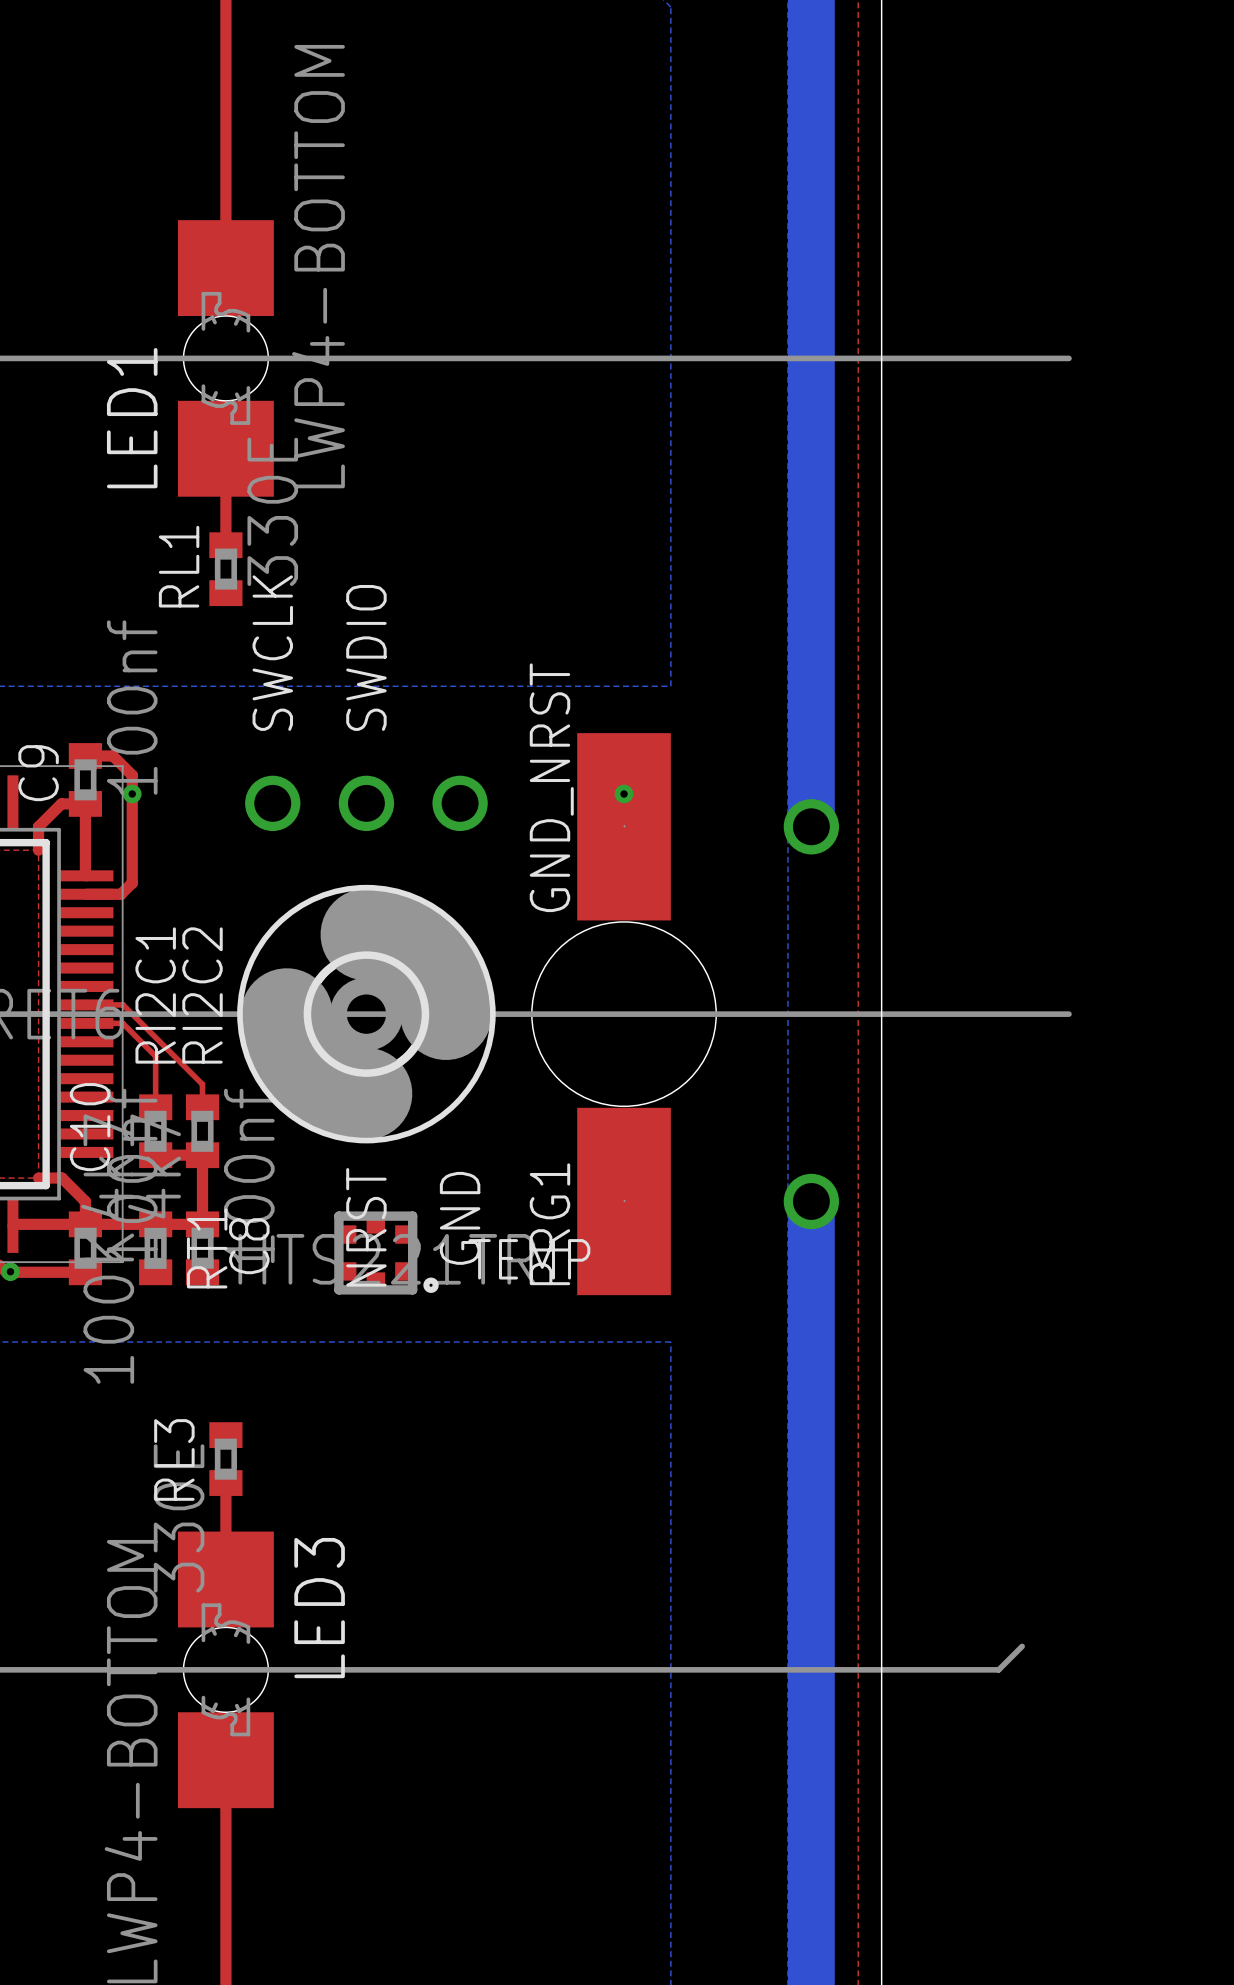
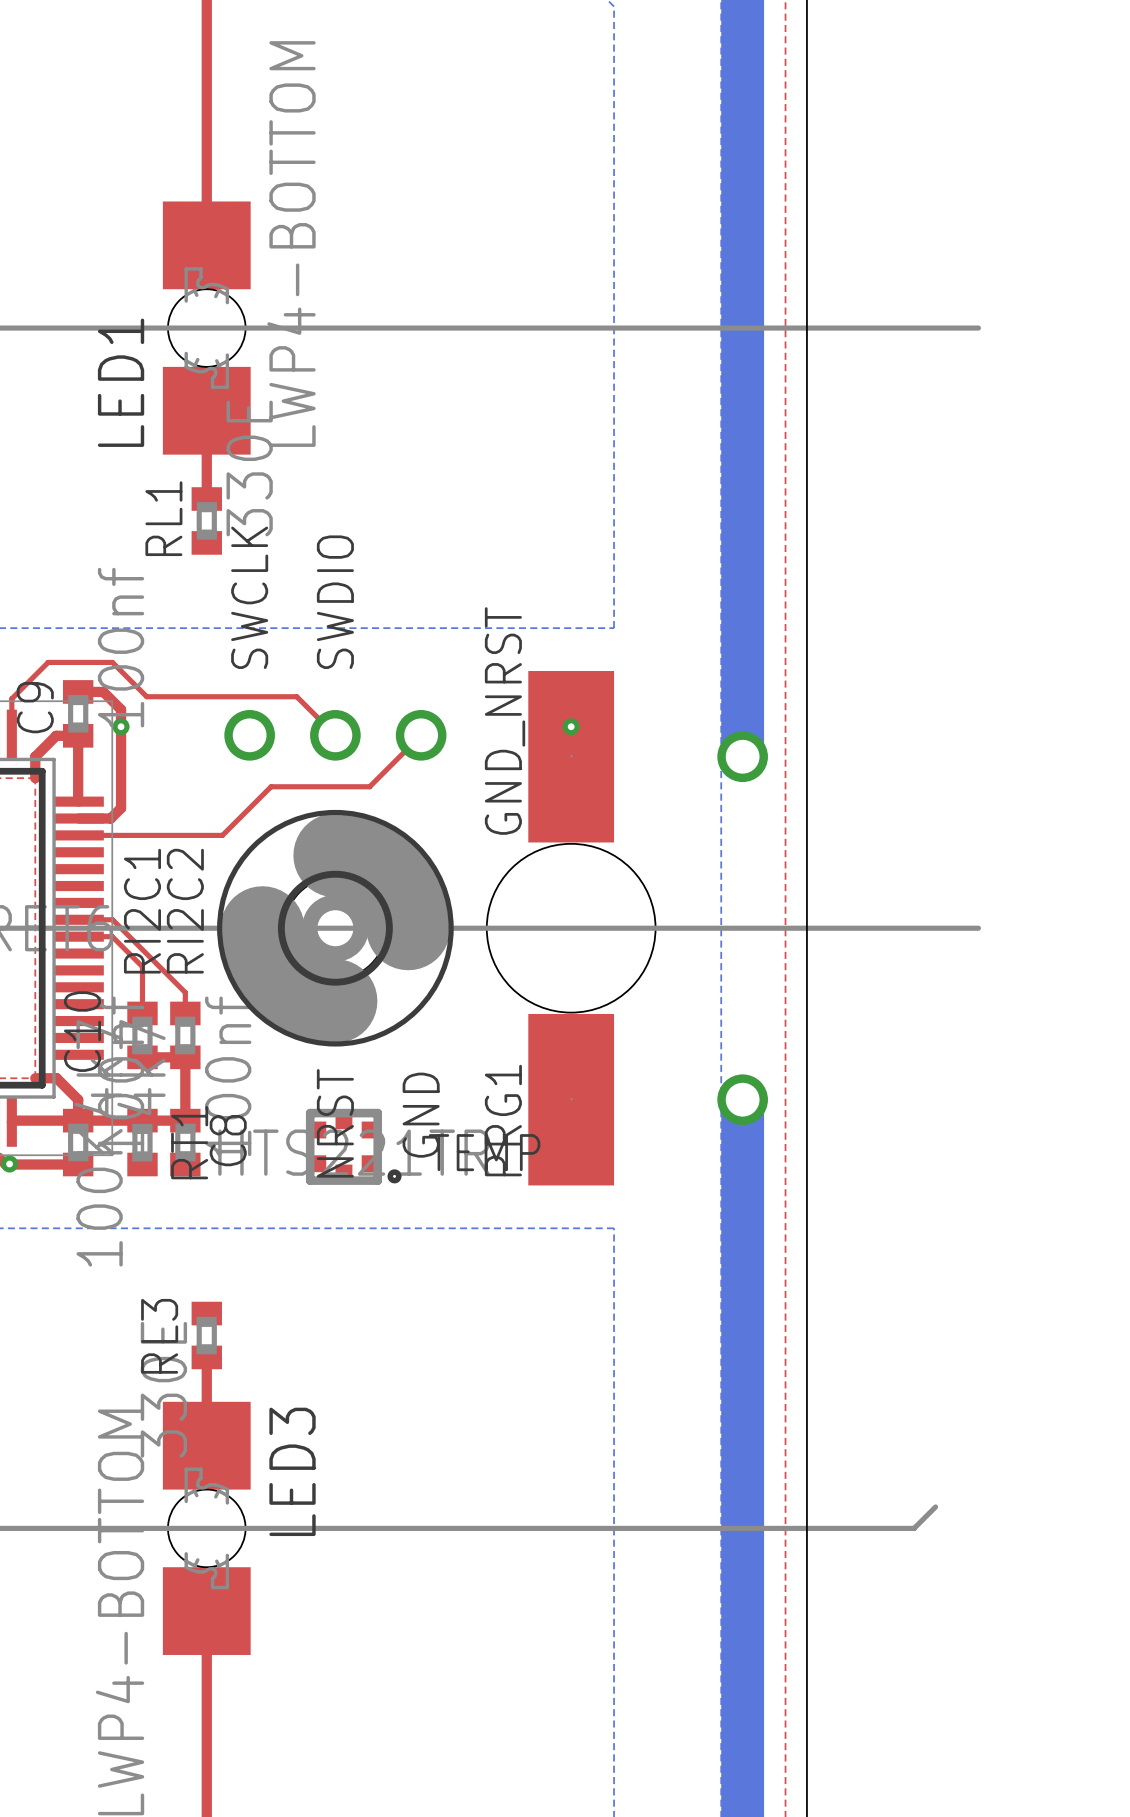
top track: none -> (11, 734) (11, 698) (48, 662) (112, 662) (146, 696) (296, 696) (335, 735)
top track: none -> (421, 735) (369, 786) (271, 786) (222, 835) (78, 835)

